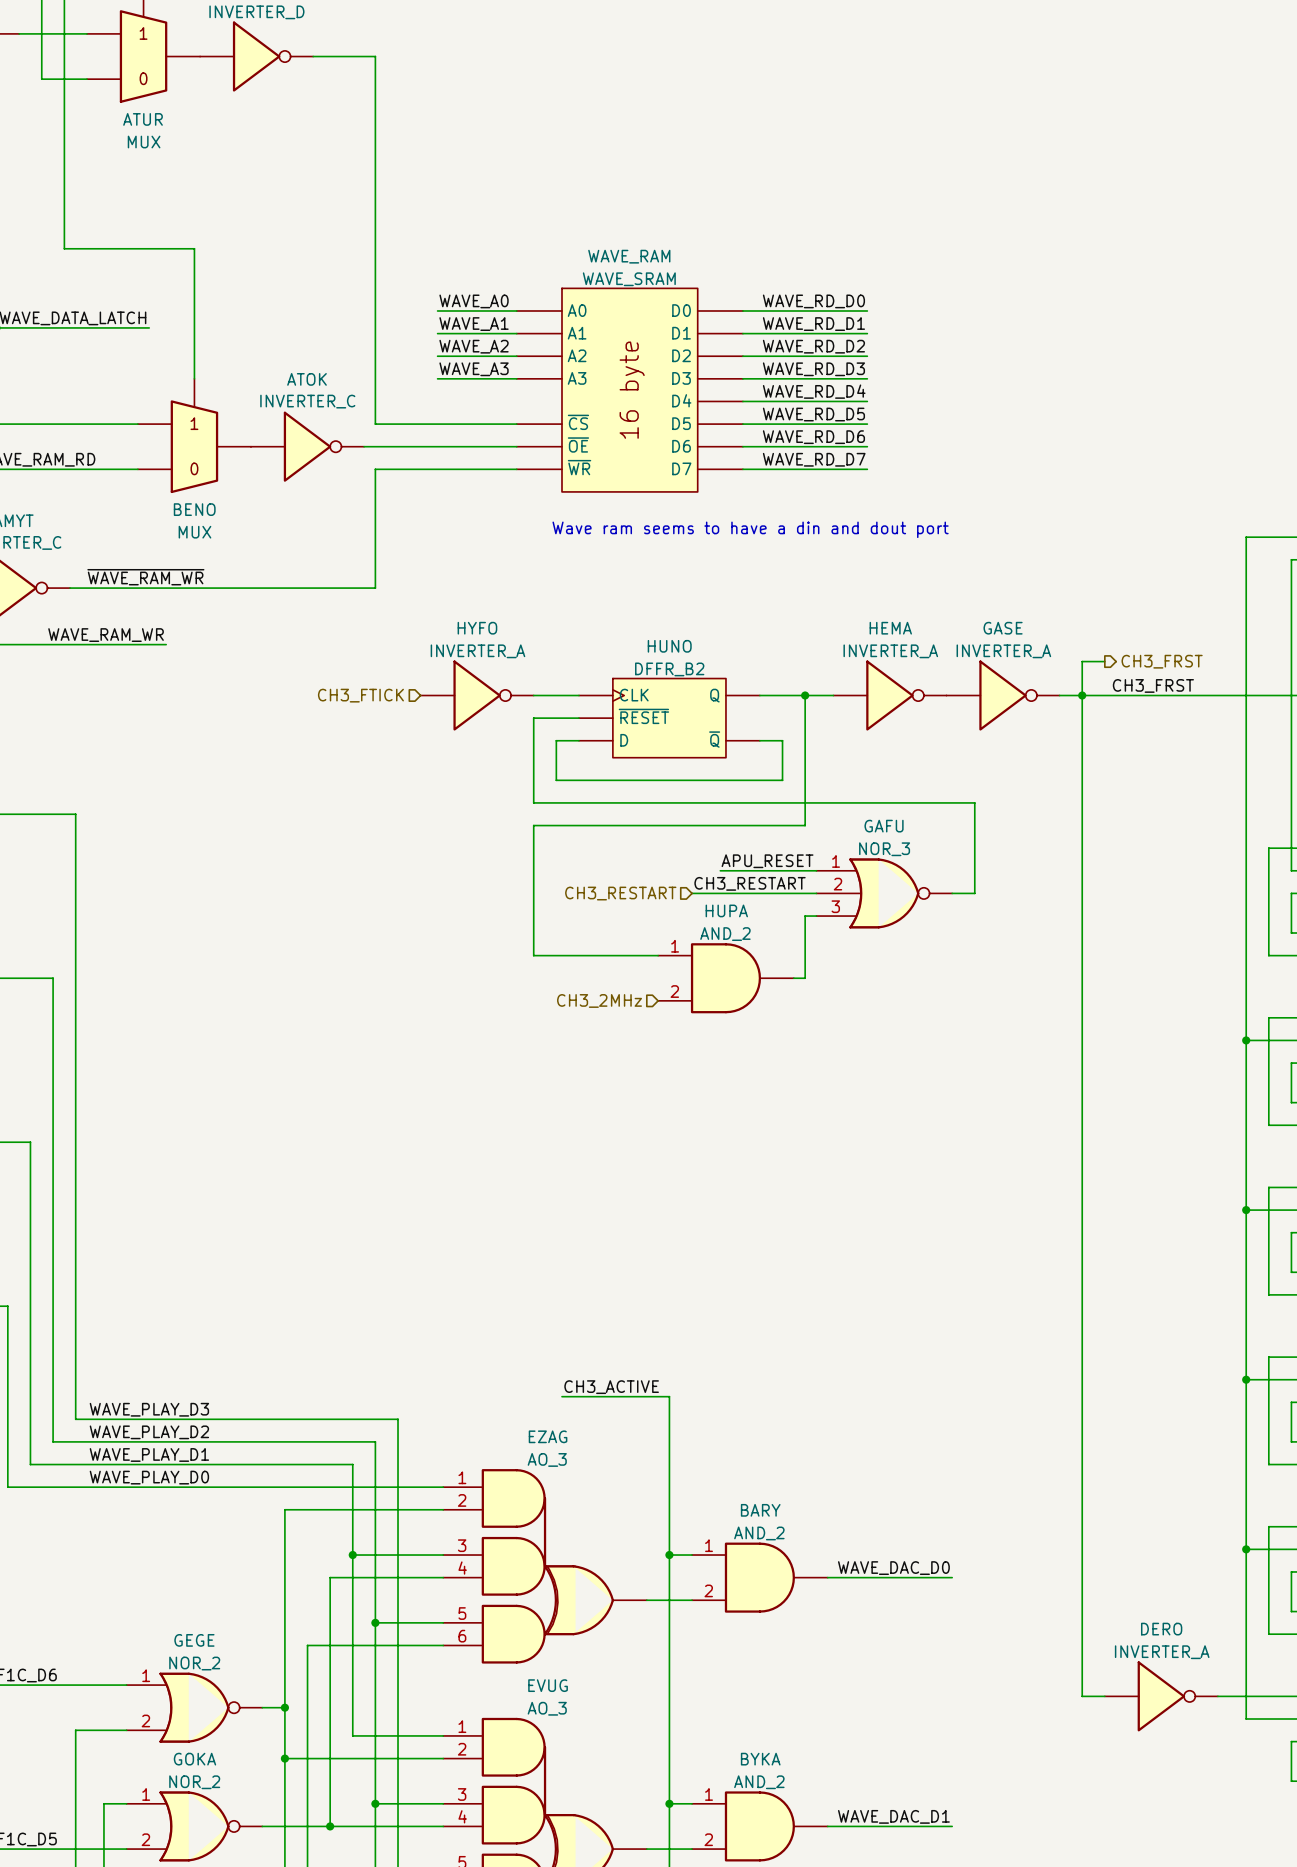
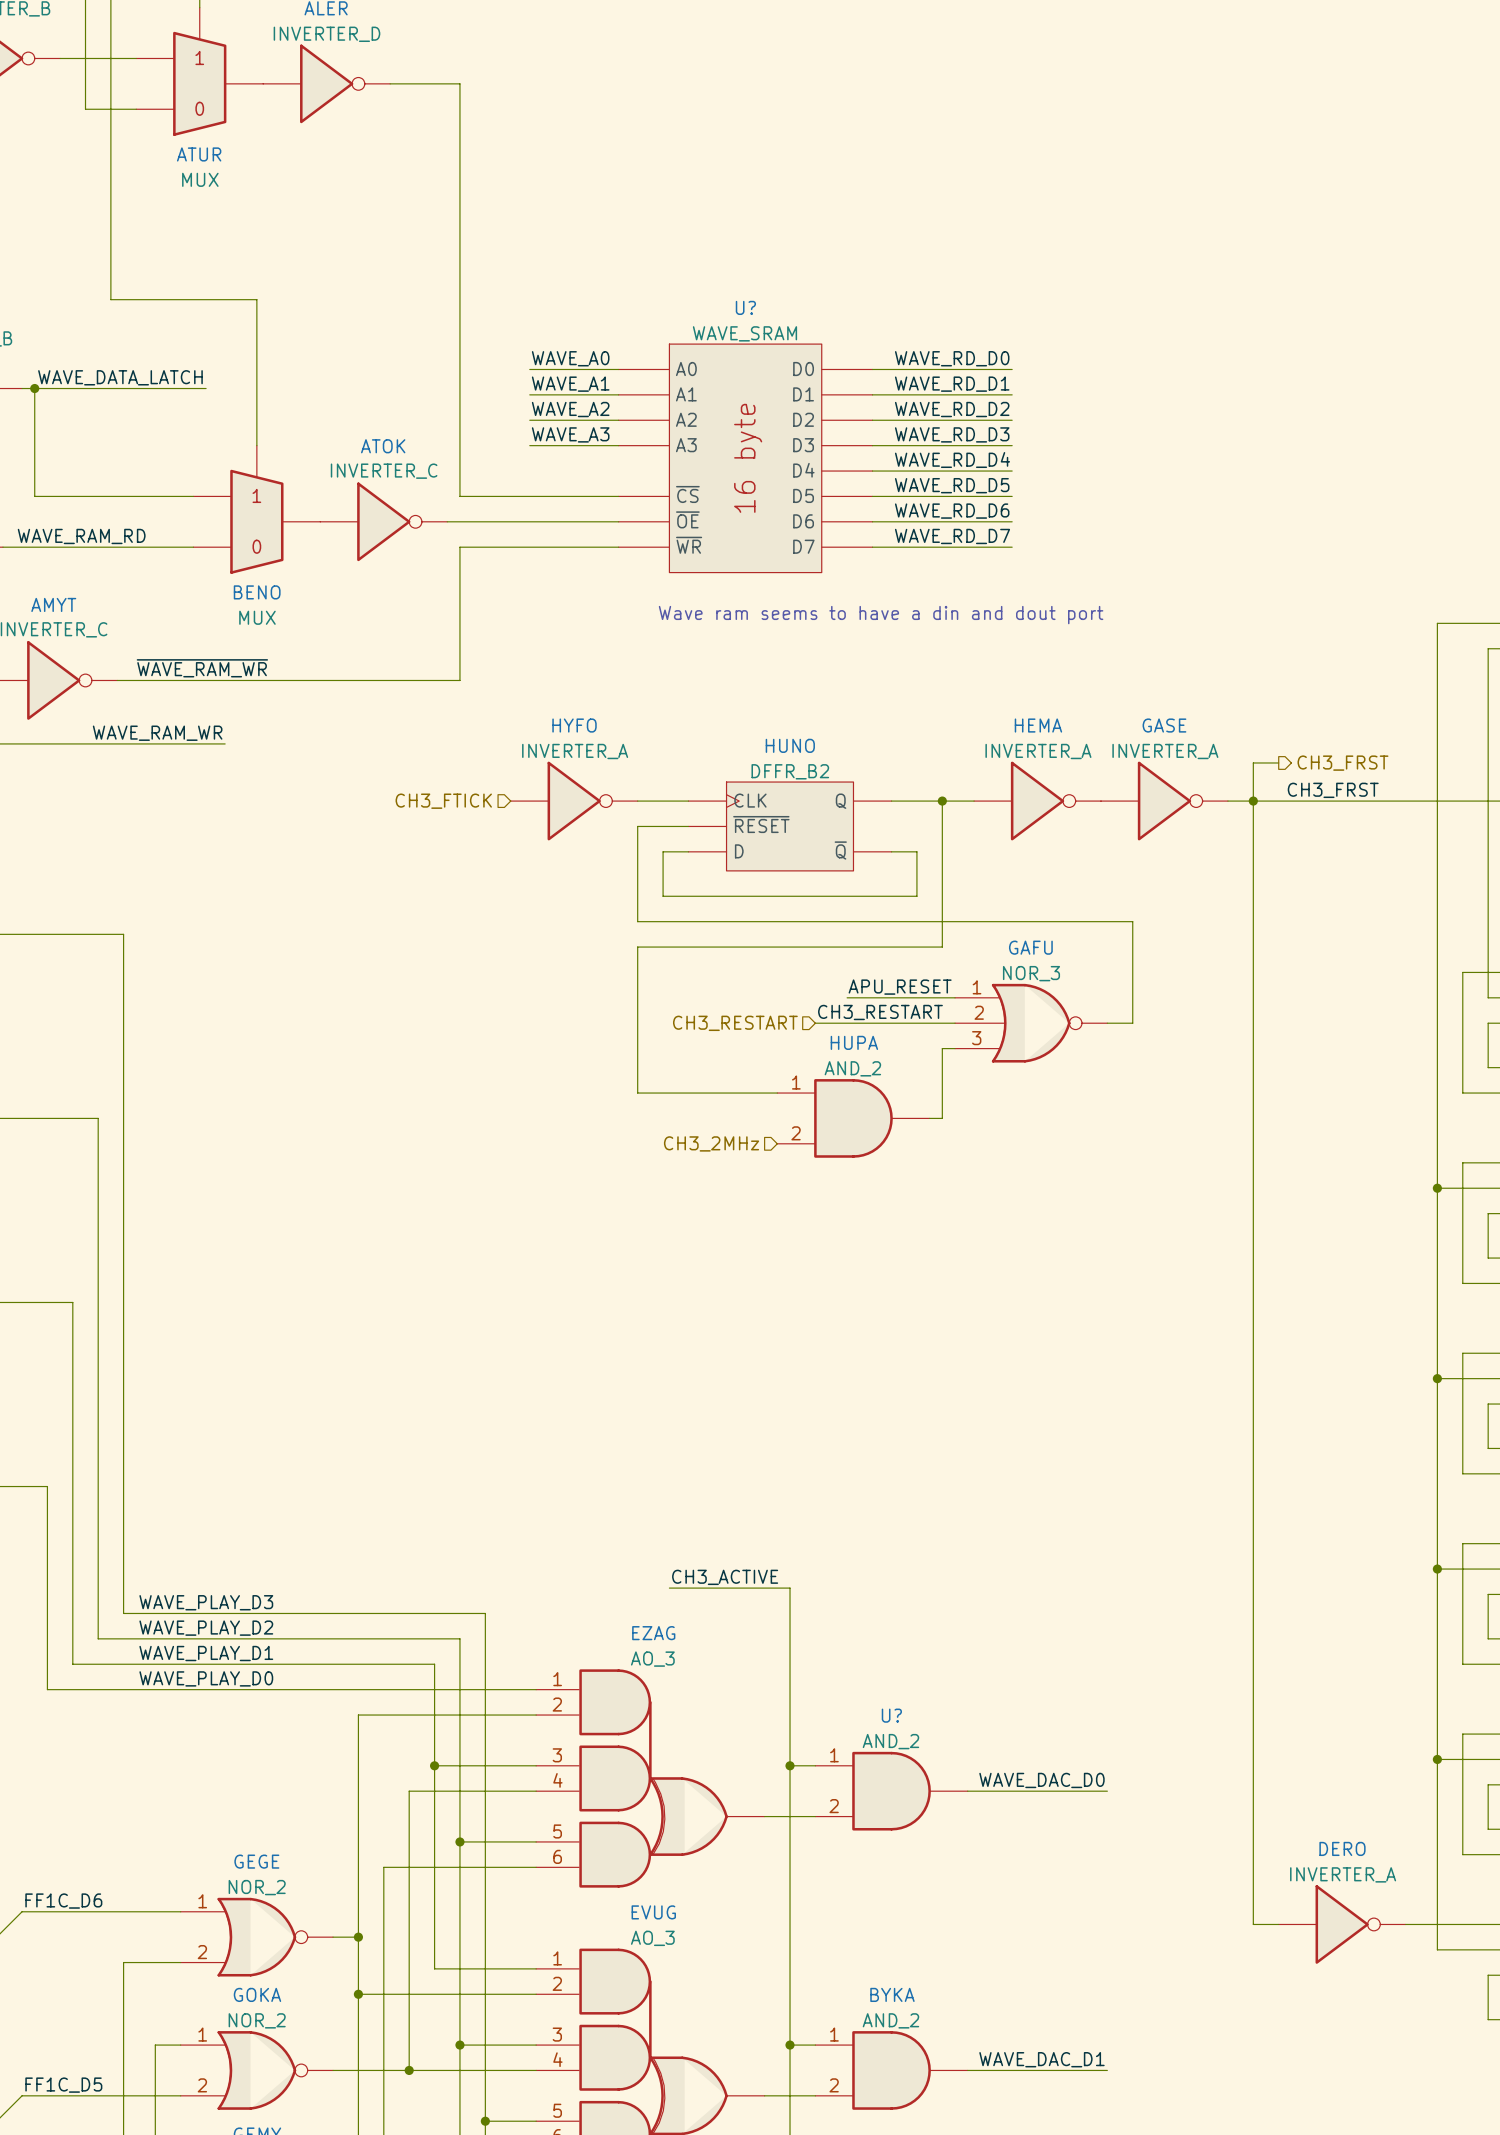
WAVE_RAM name: WAVE_RAM (629, 256) -> U? (745, 307)
BARY name: BARY (760, 1510) -> U? (891, 1715)

